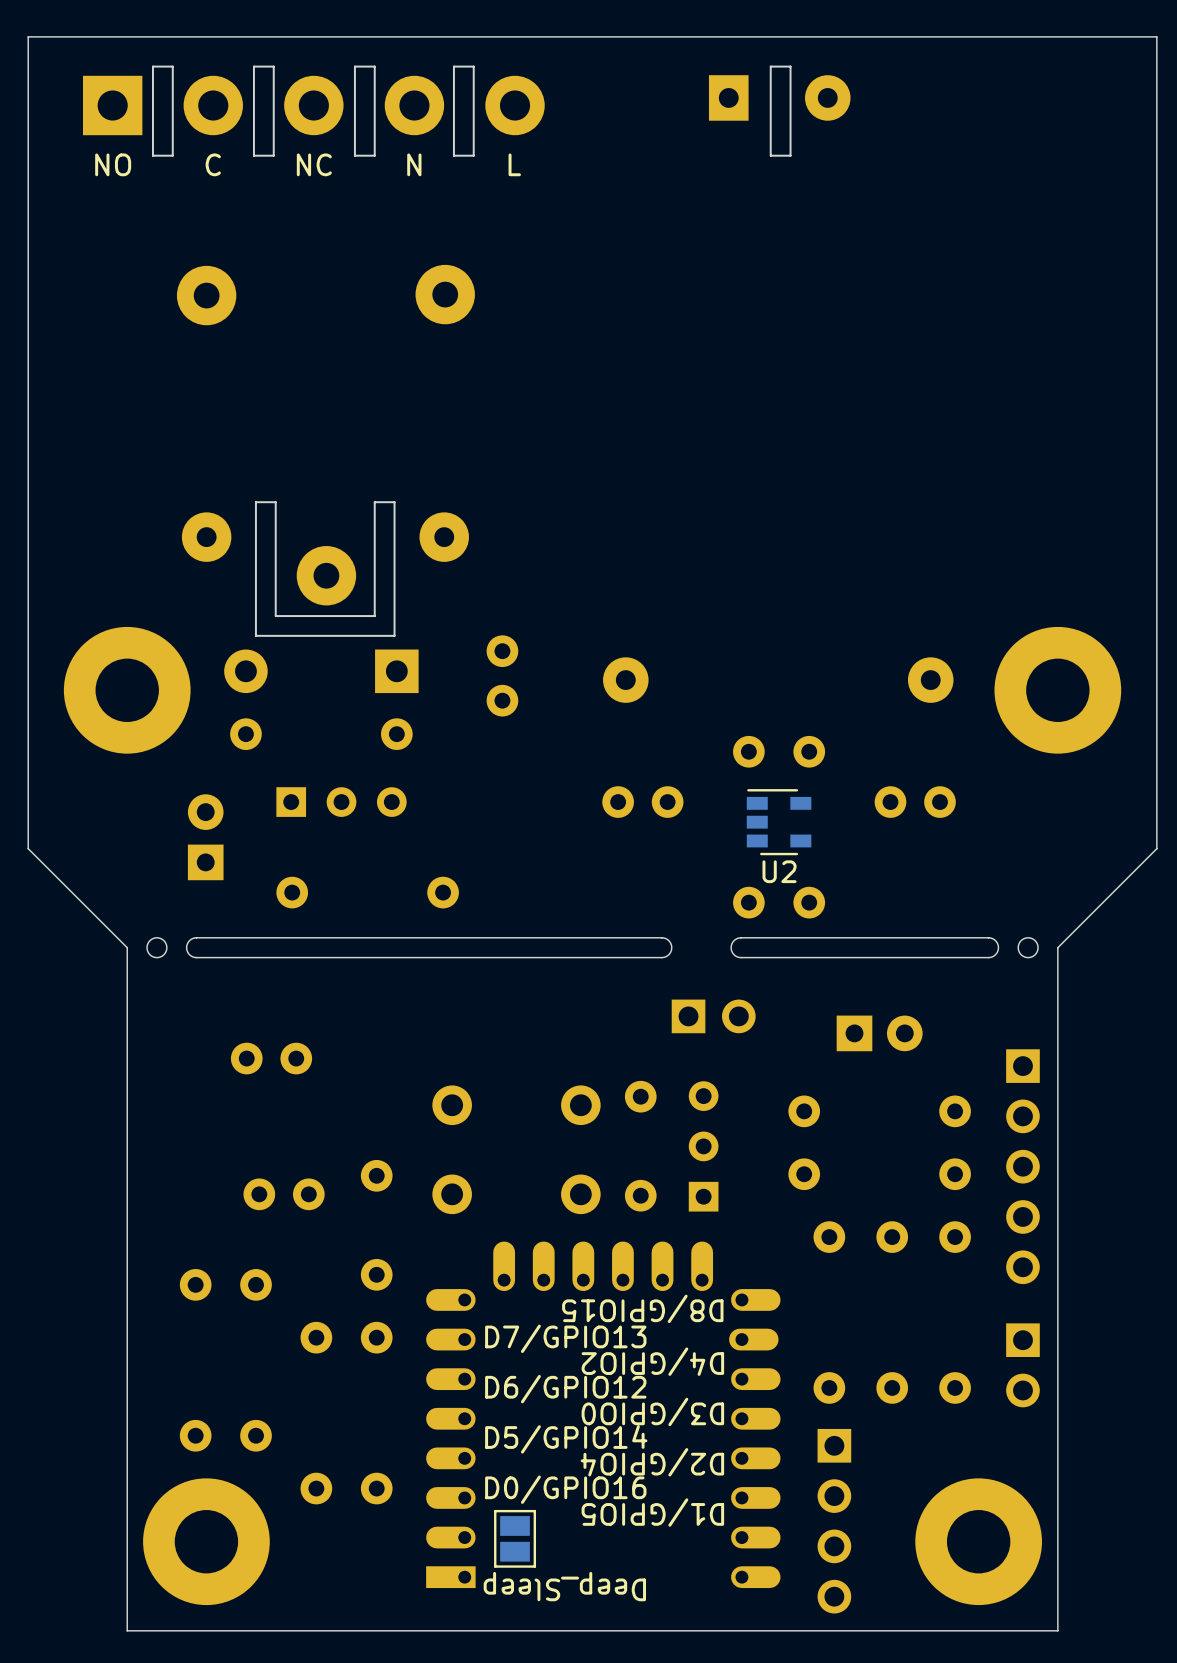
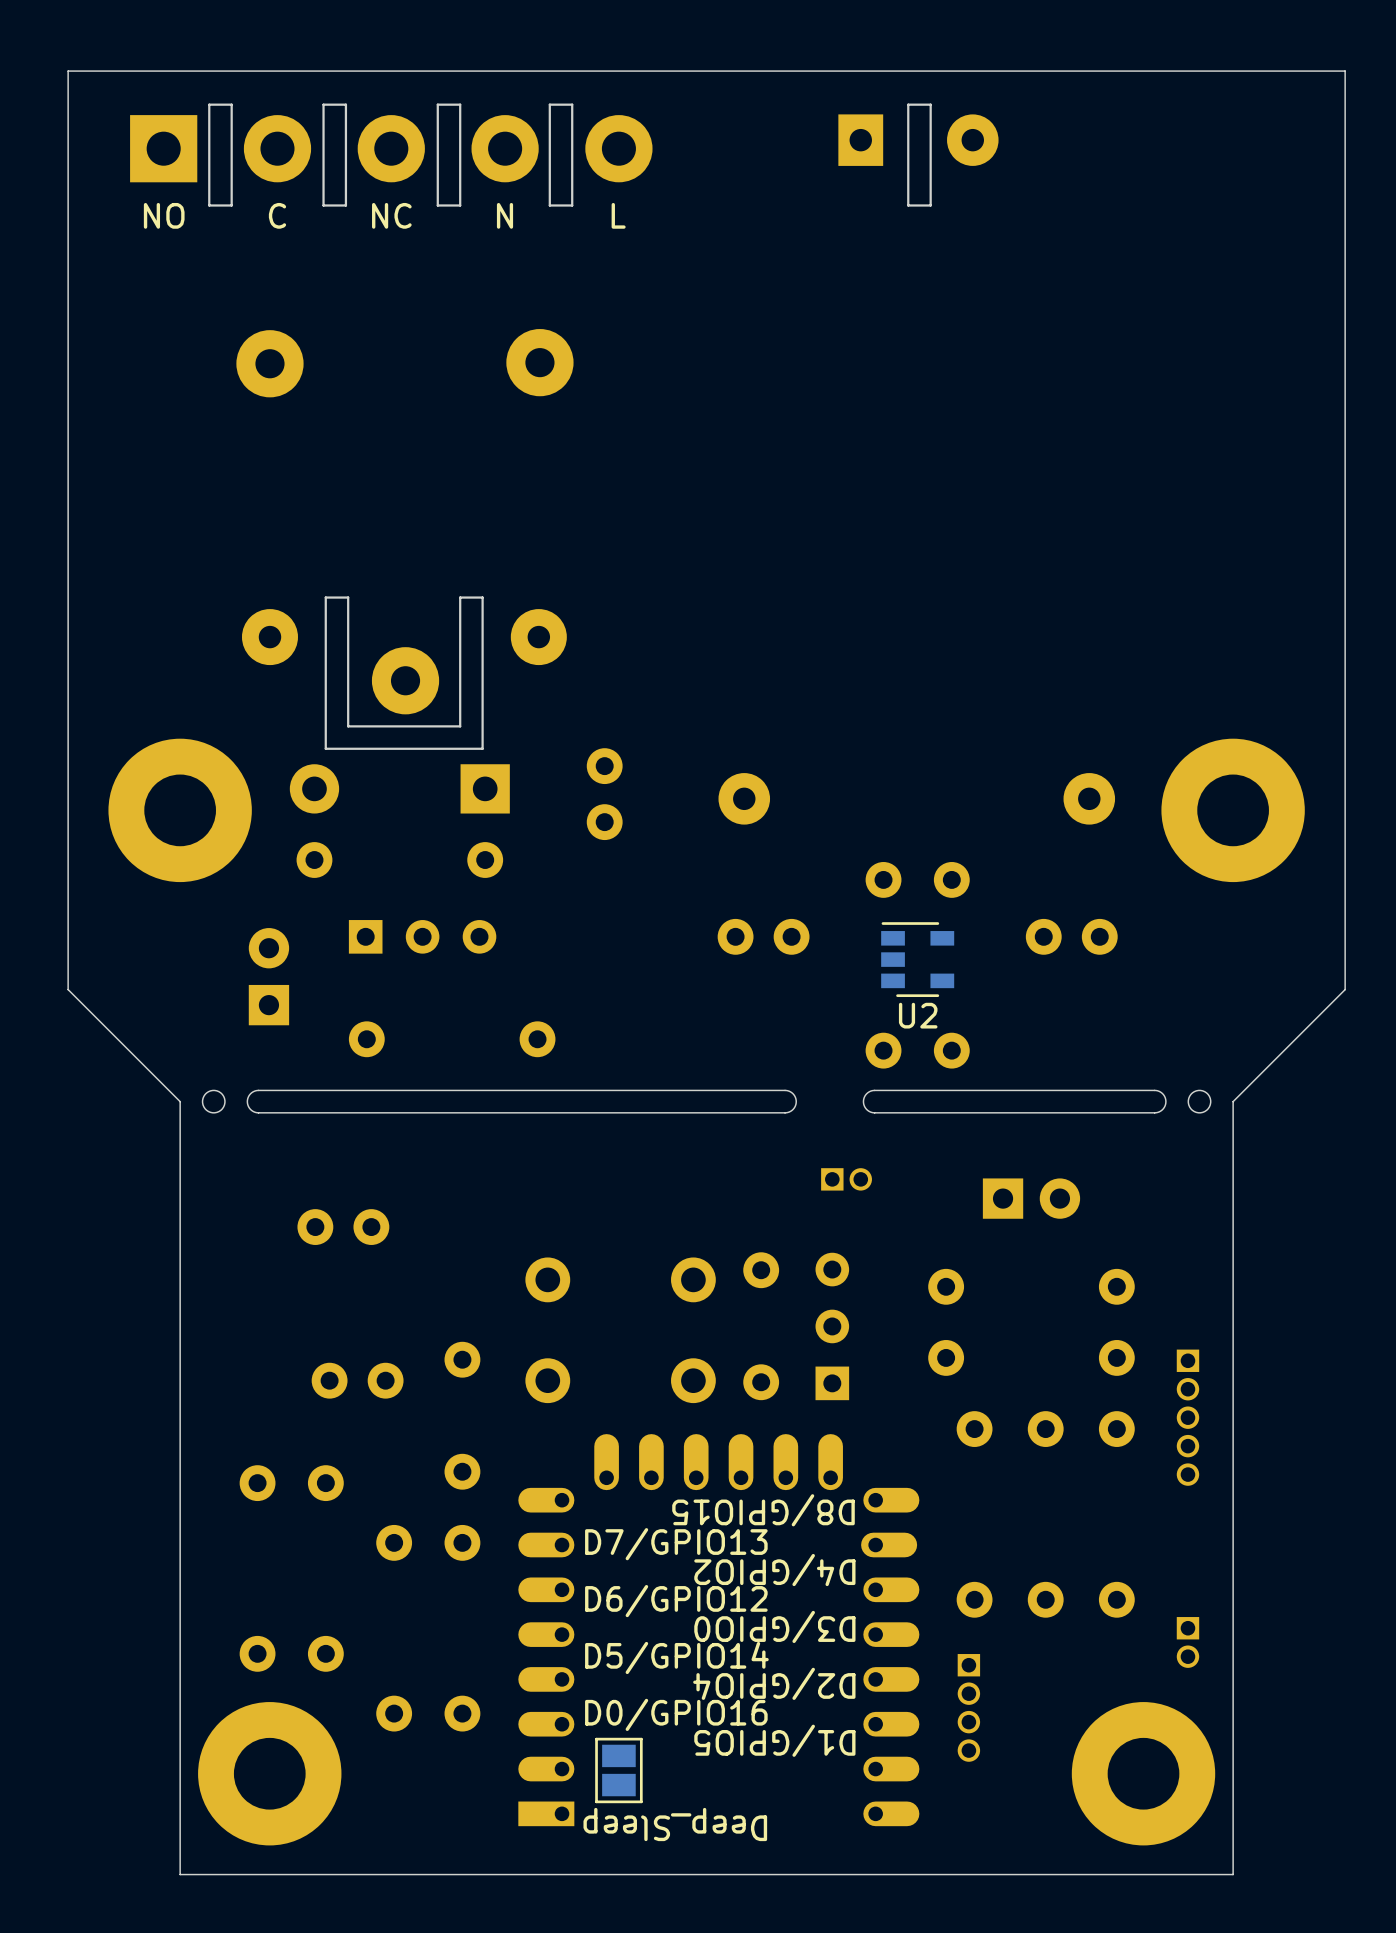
part footprint: [671, 999, 756, 1034] -> [821, 1168, 872, 1191]
part: (1022, 1166) -> none
part: none -> (1187, 1417)
part: (1022, 1365) -> none
part: none -> (1187, 1642)
part: none -> (968, 1707)
part: (834, 1521) -> none

